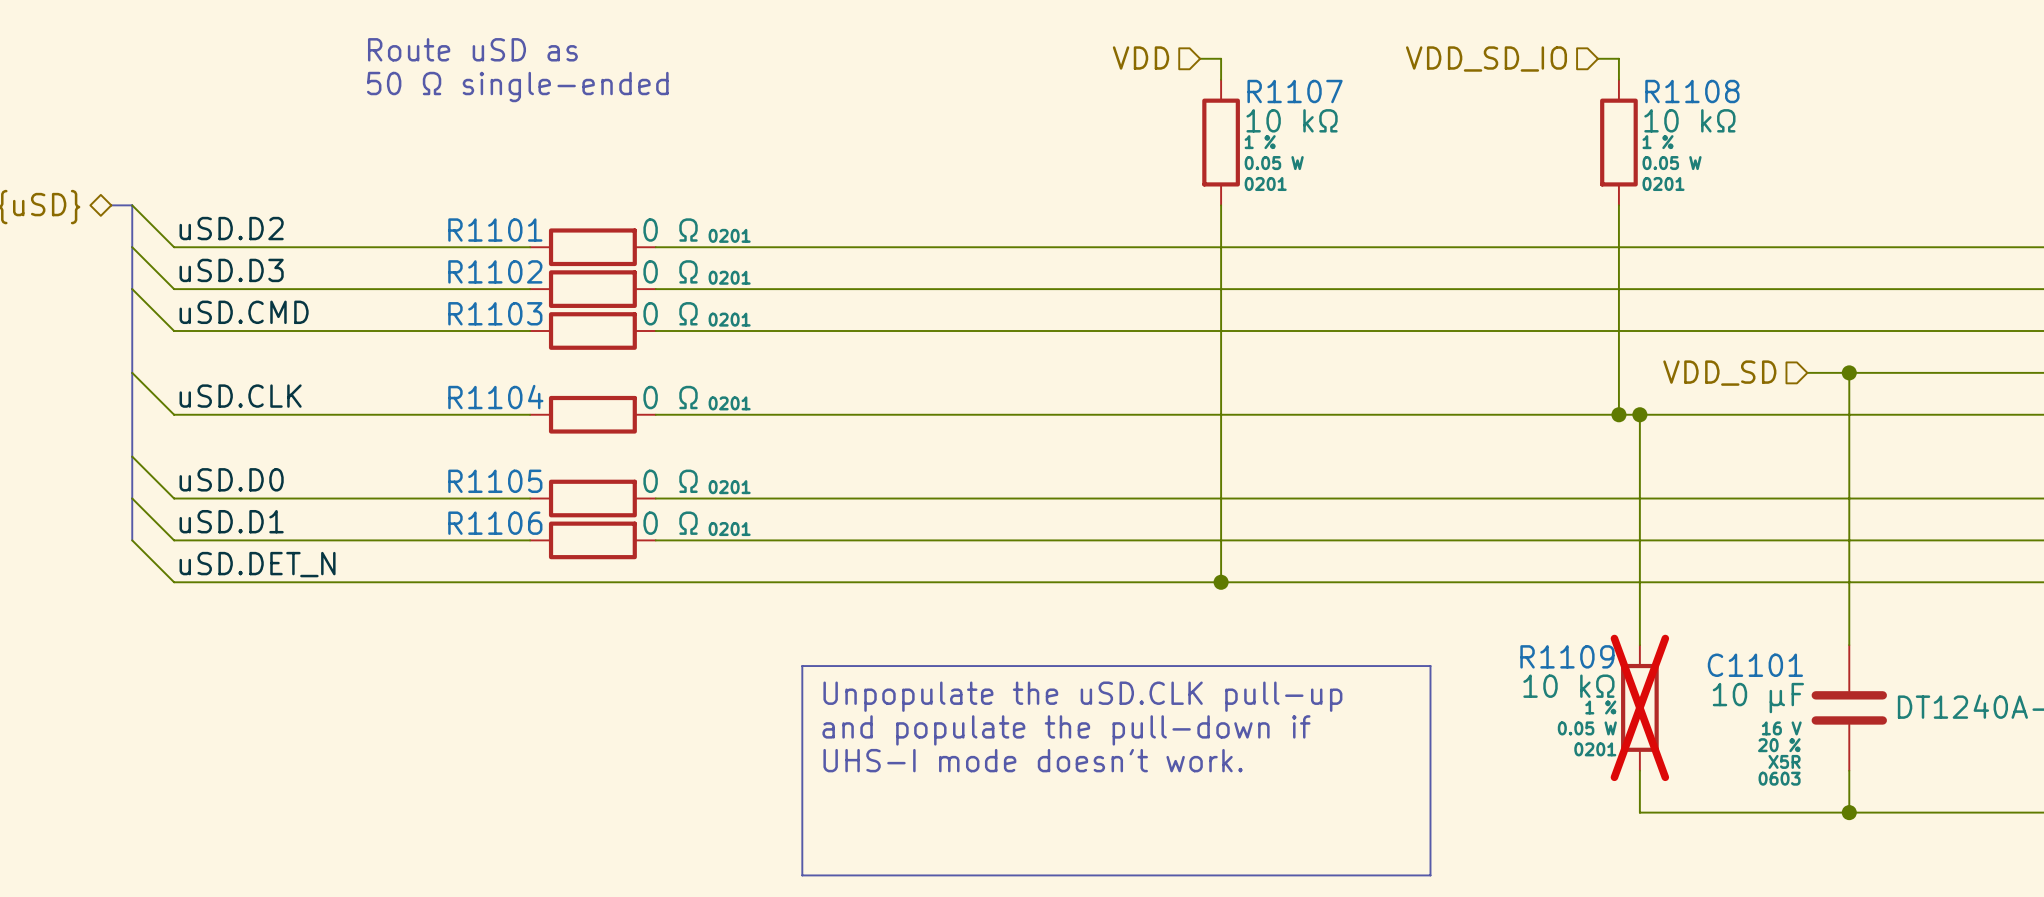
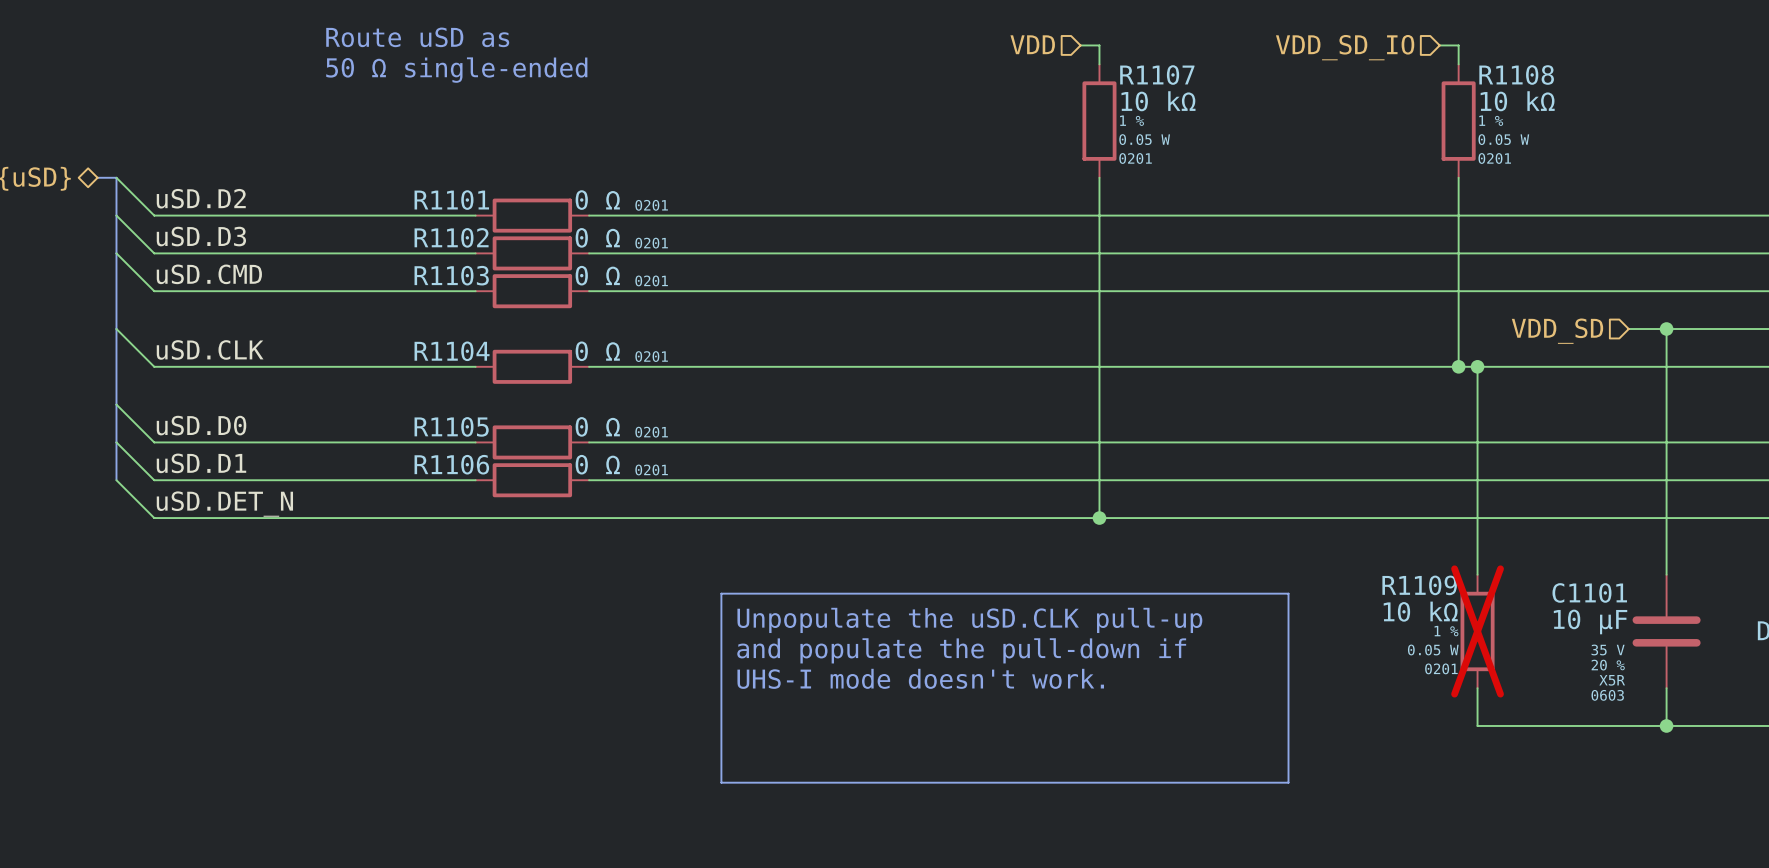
C1101 text: 16 V (1781, 728) -> 35 V (1608, 649)

